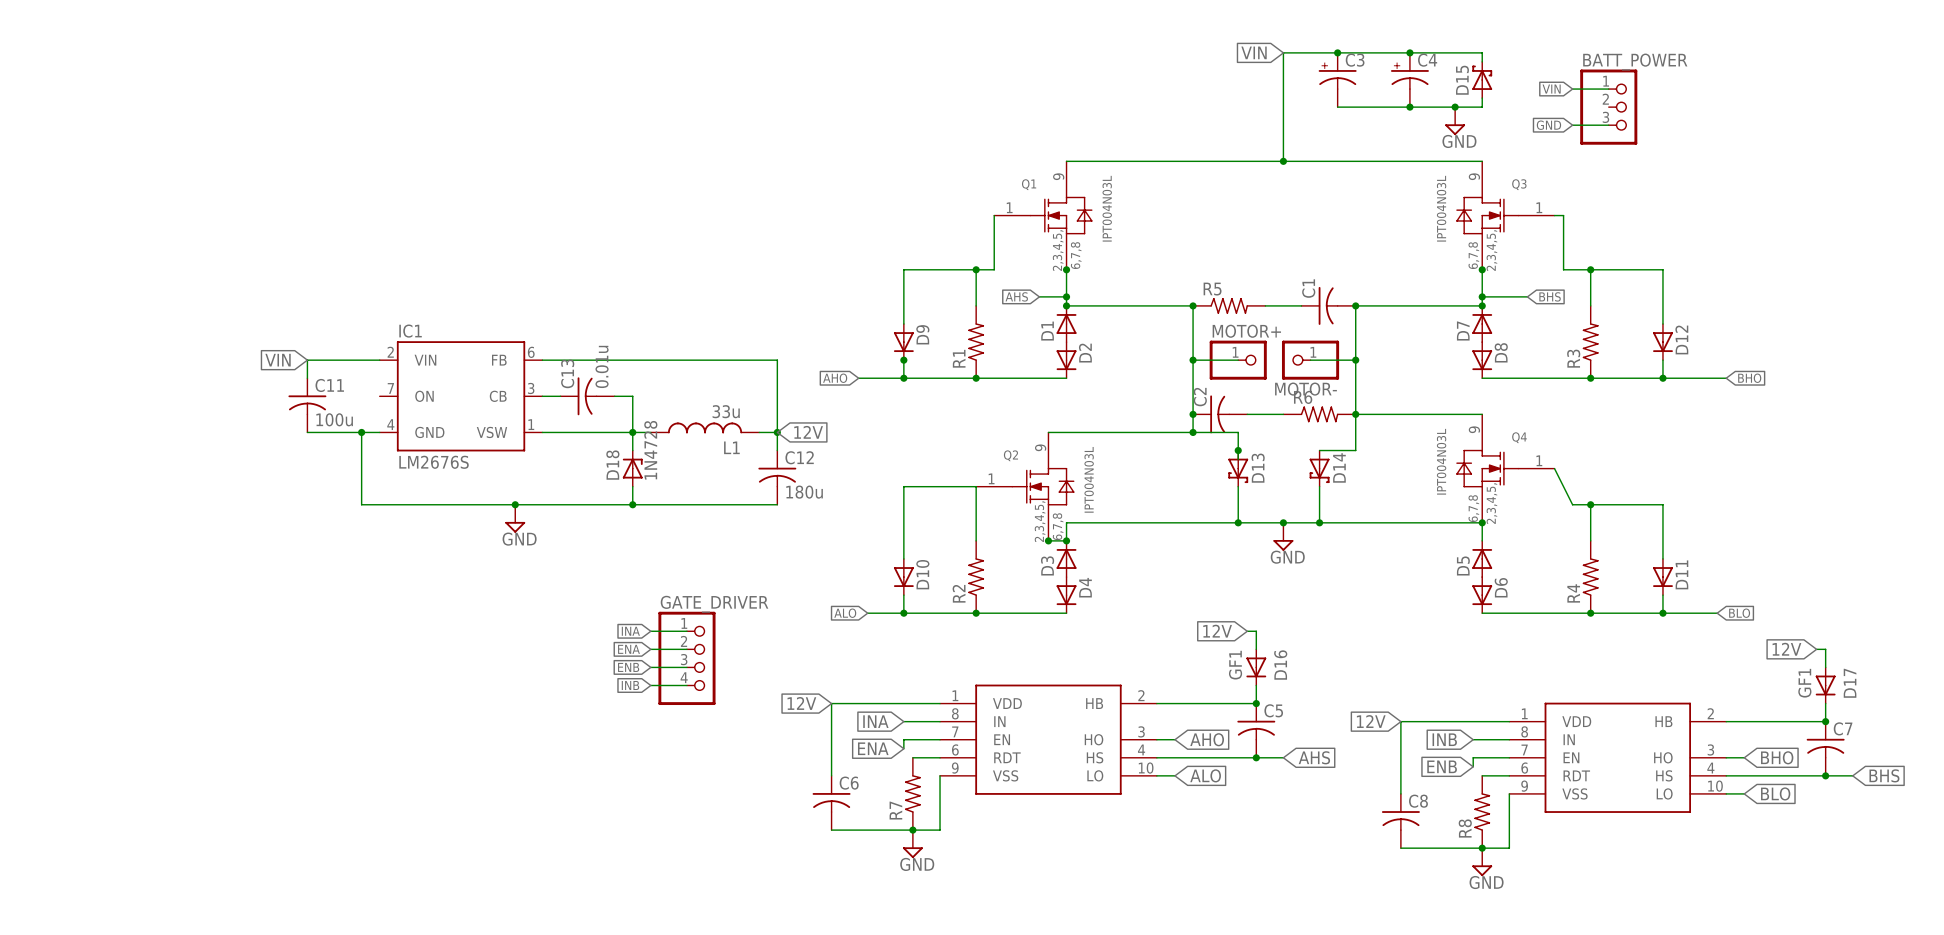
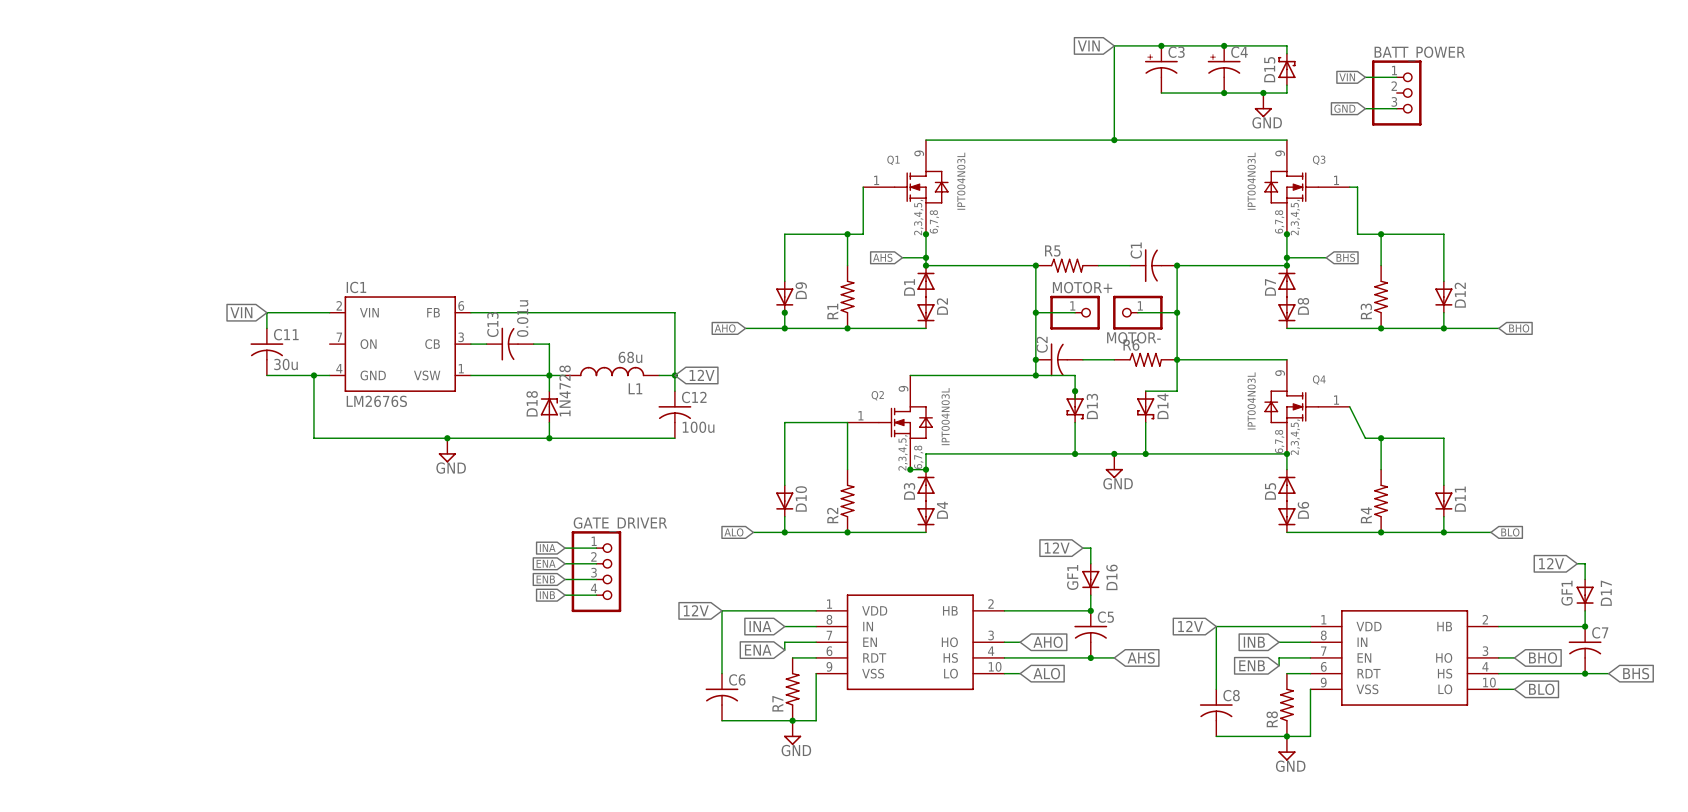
L1 value: 33u (726, 411) -> 68u (630, 357)
C11 value: 100u (334, 419) -> 30u (286, 364)
C12 value: 180u (804, 492) -> 100u (698, 427)

